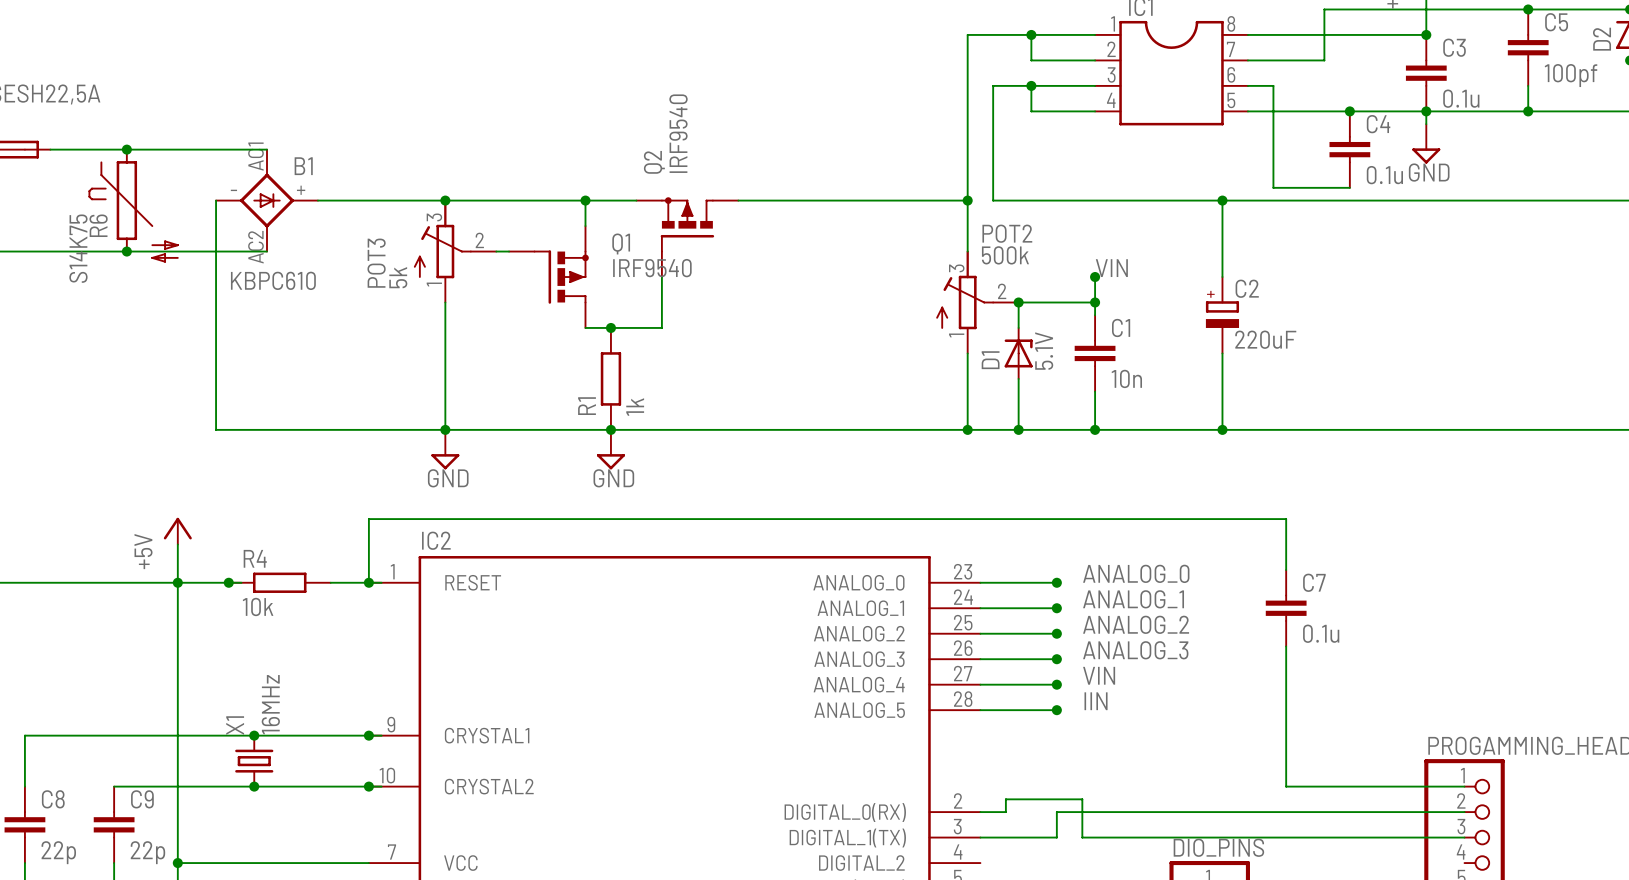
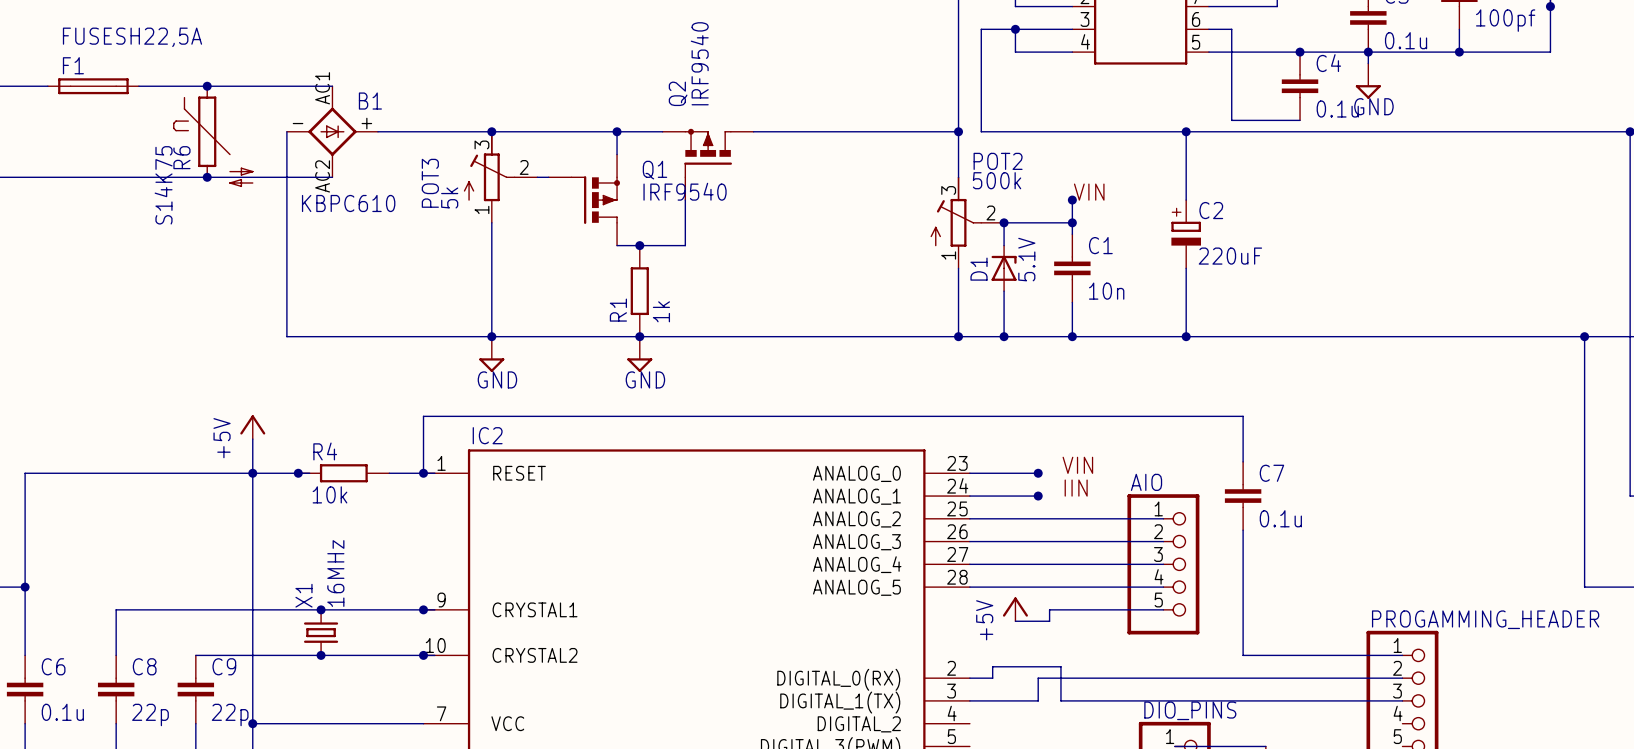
label: ANALOG_0 (1136, 573) -> VIN (1077, 465)
label: ANALOG_1 (1133, 599) -> IIN (1076, 488)
label: ANALOG_2 (1136, 624) -> none
wire: none -> (1038, 518) (1163, 518)
junction: (1056, 633) -> none
label: ANALOG_3 (1135, 650) -> none
wire: none -> (1038, 541) (1163, 541)
junction: (1056, 659) -> none
label: VIN (1099, 675) -> none
wire: none -> (1038, 564) (1163, 564)
junction: (1056, 684) -> none
AIO: none -> (1163, 564)
label: IIN (1096, 701) -> none
wire: none -> (1038, 587) (1163, 587)
junction: (1056, 710) -> none
power symbol: none -> +5V (1015, 609)
wire: none -> (1163, 609) (1049, 609) (1049, 621) (1015, 621)

